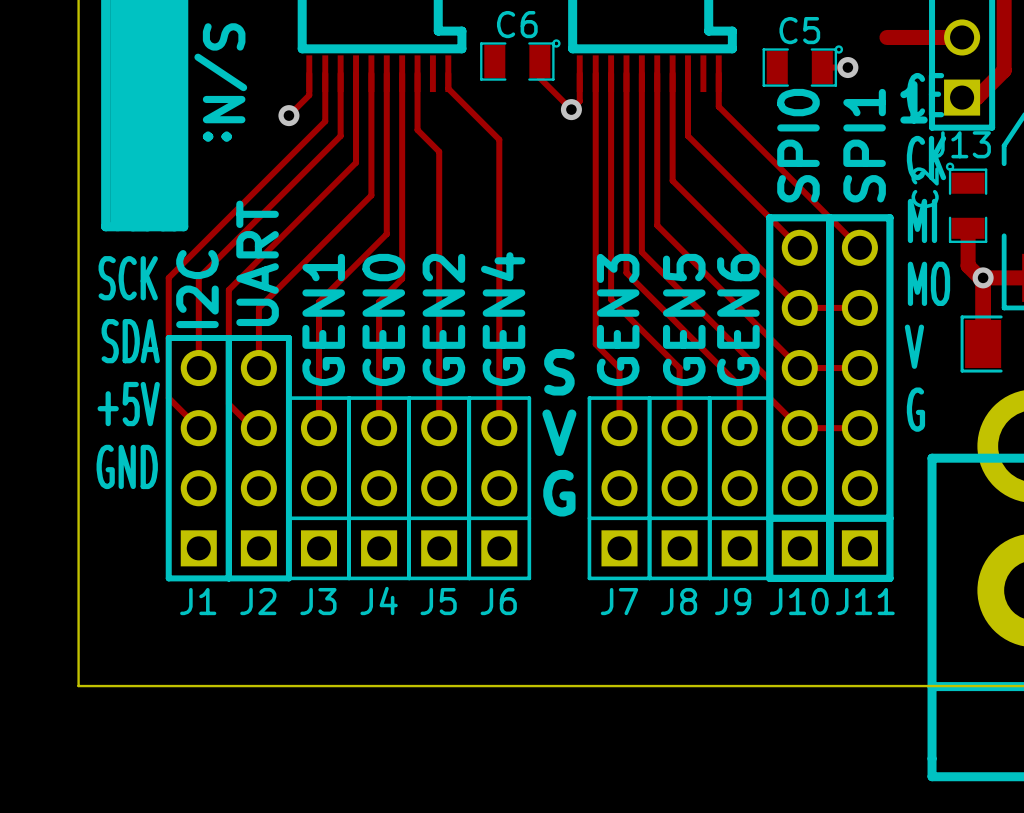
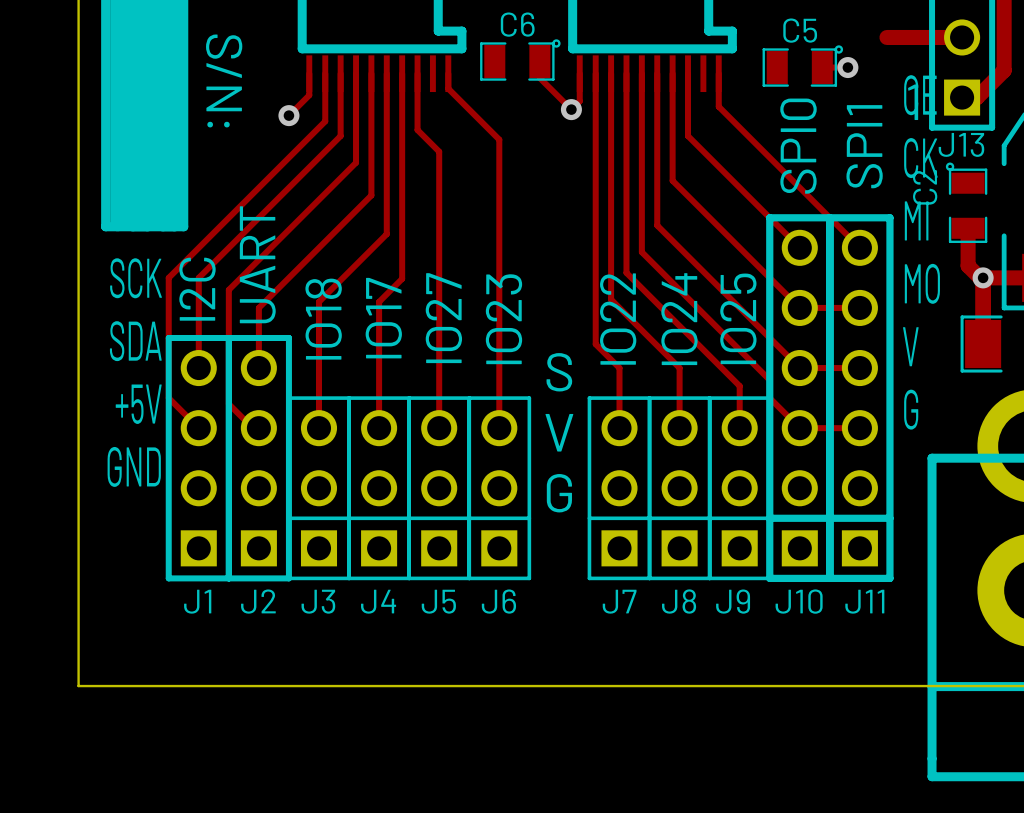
text: GEN1 (323, 319) -> IO18 (323, 319)
text: GEN0 (383, 319) -> IO17 (383, 318)
text: GEN2 (443, 319) -> IO27 (443, 318)
text: GEN4 (503, 319) -> IO23 (503, 319)
text: GEN3 (618, 319) -> IO22 (618, 319)
text: GEN5 (684, 319) -> IO24 (679, 319)
text: GEN6 (738, 319) -> IO25 (738, 318)

